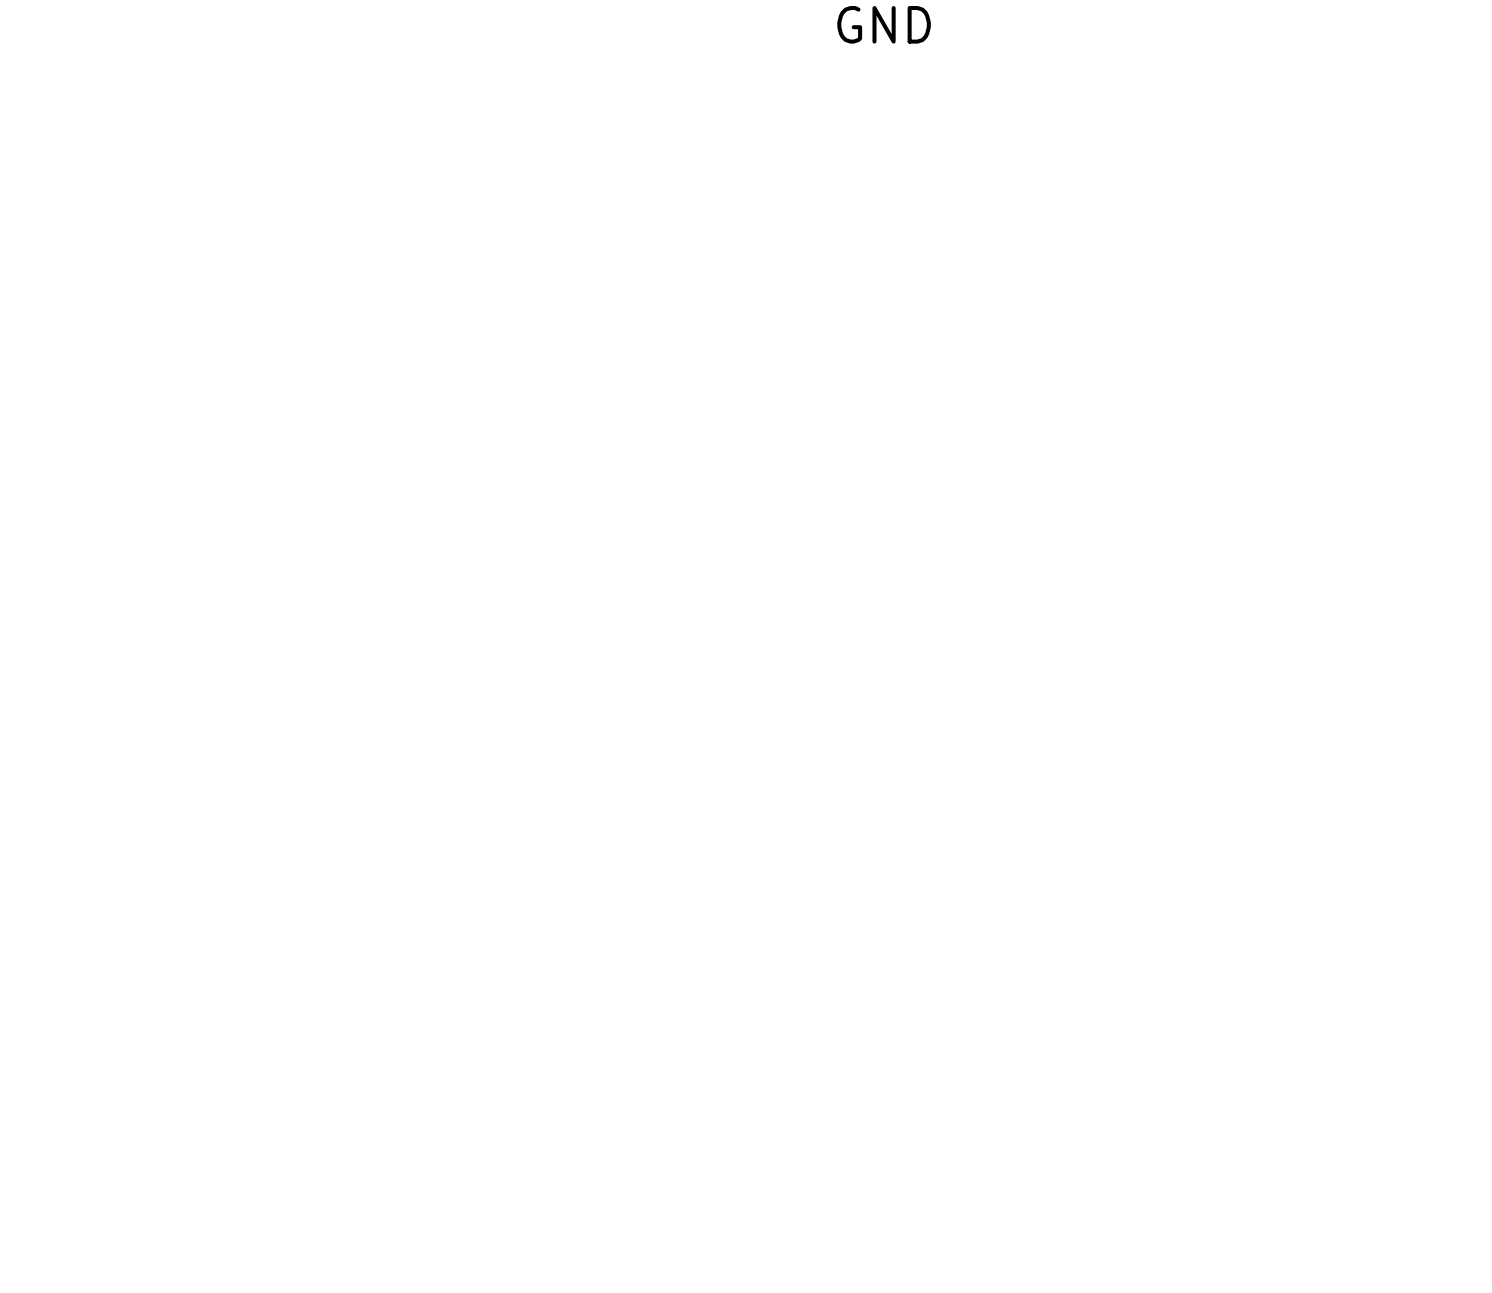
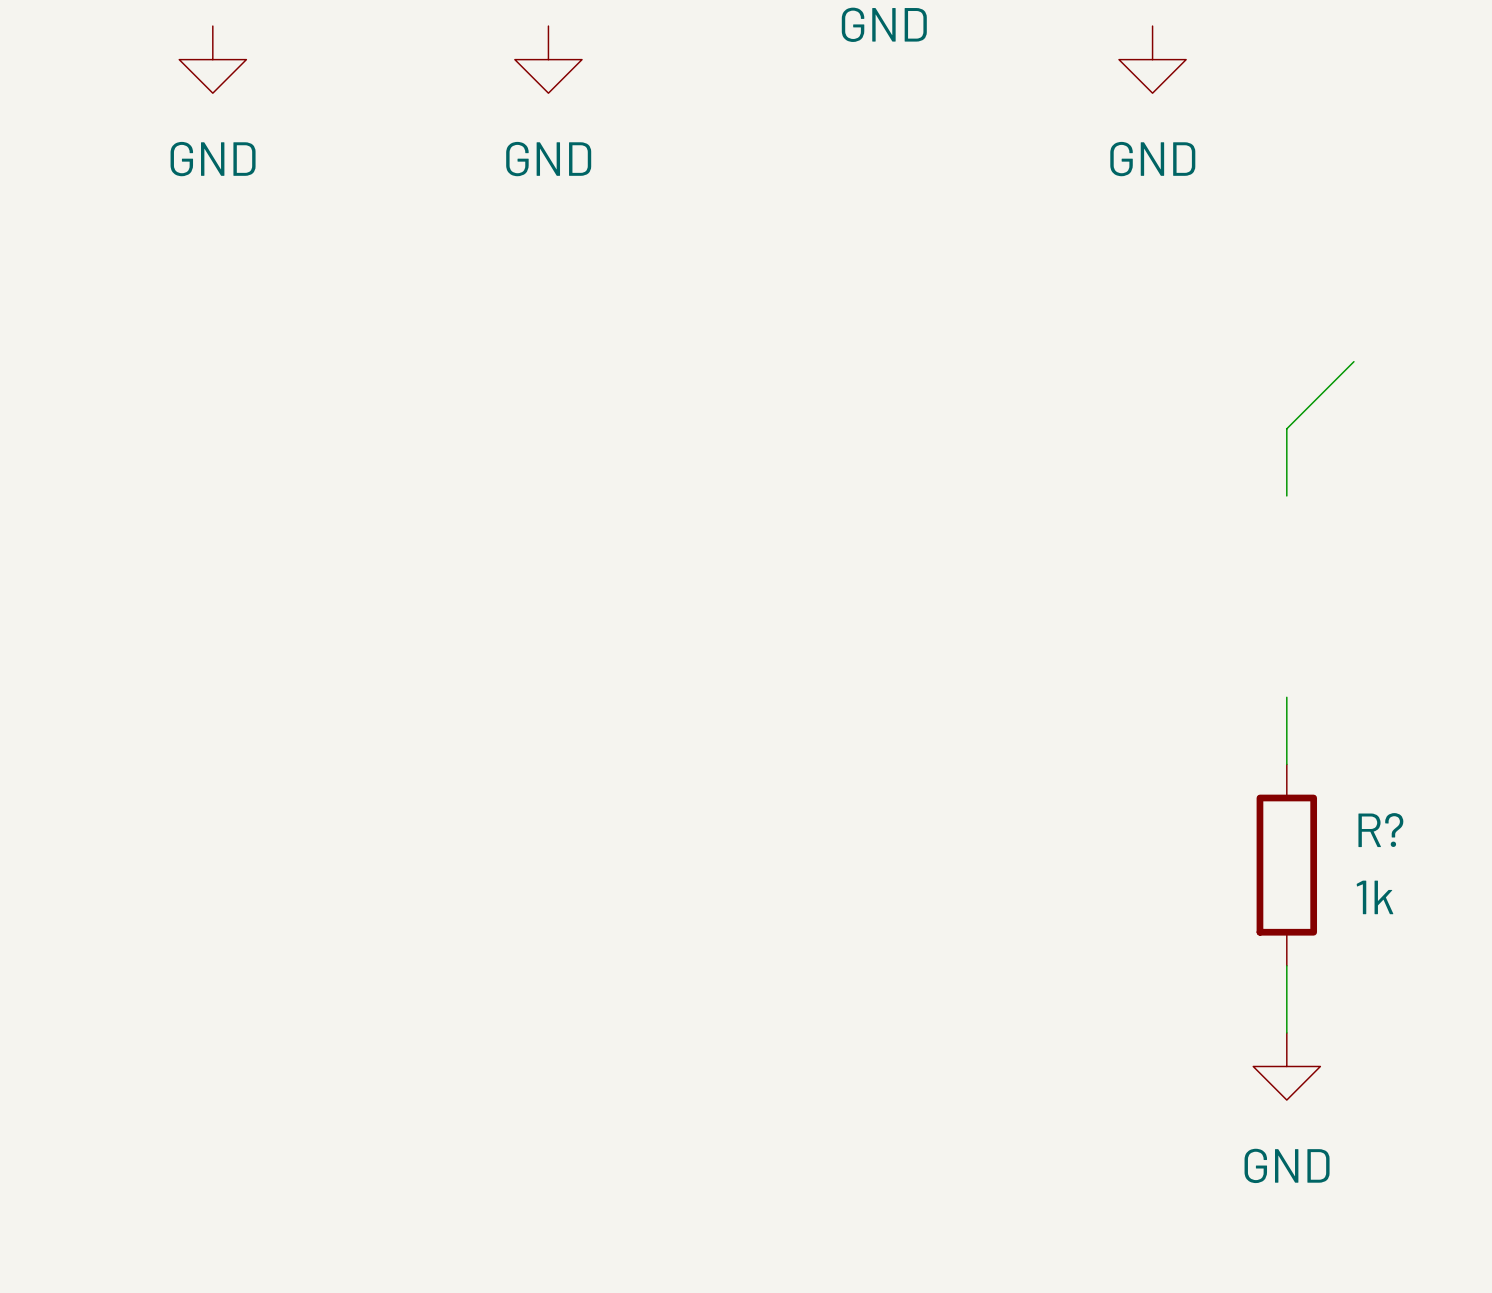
power symbol: none -> GND (212, 59)
power symbol: none -> GND (548, 59)
power symbol: none -> GND (1152, 59)
wire: none -> (1353, 361) (1286, 428) (1286, 495)
wire: none -> (1286, 697) (1286, 764)
R?: none -> 1k (1286, 865)
wire: none -> (1286, 965) (1286, 1032)
power symbol: none -> GND (1286, 1066)

